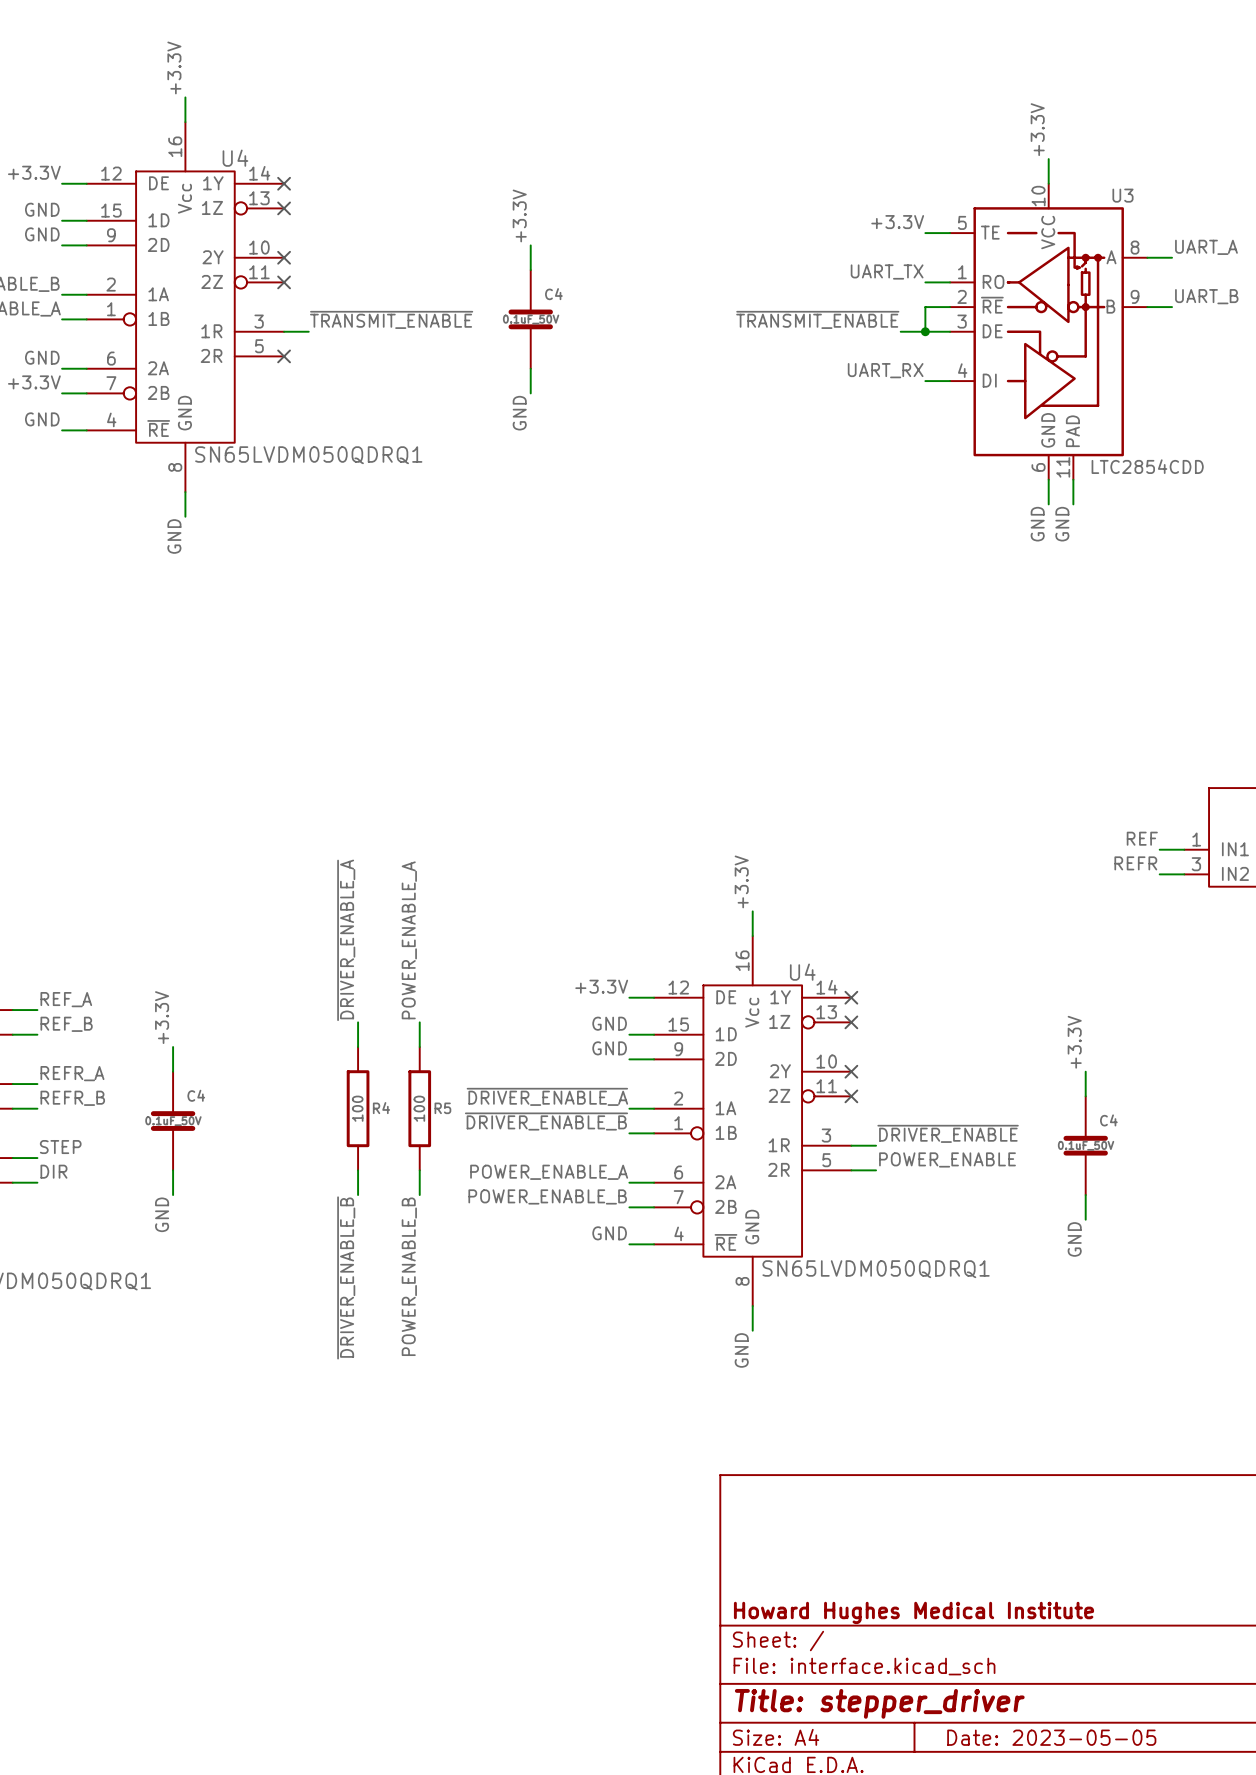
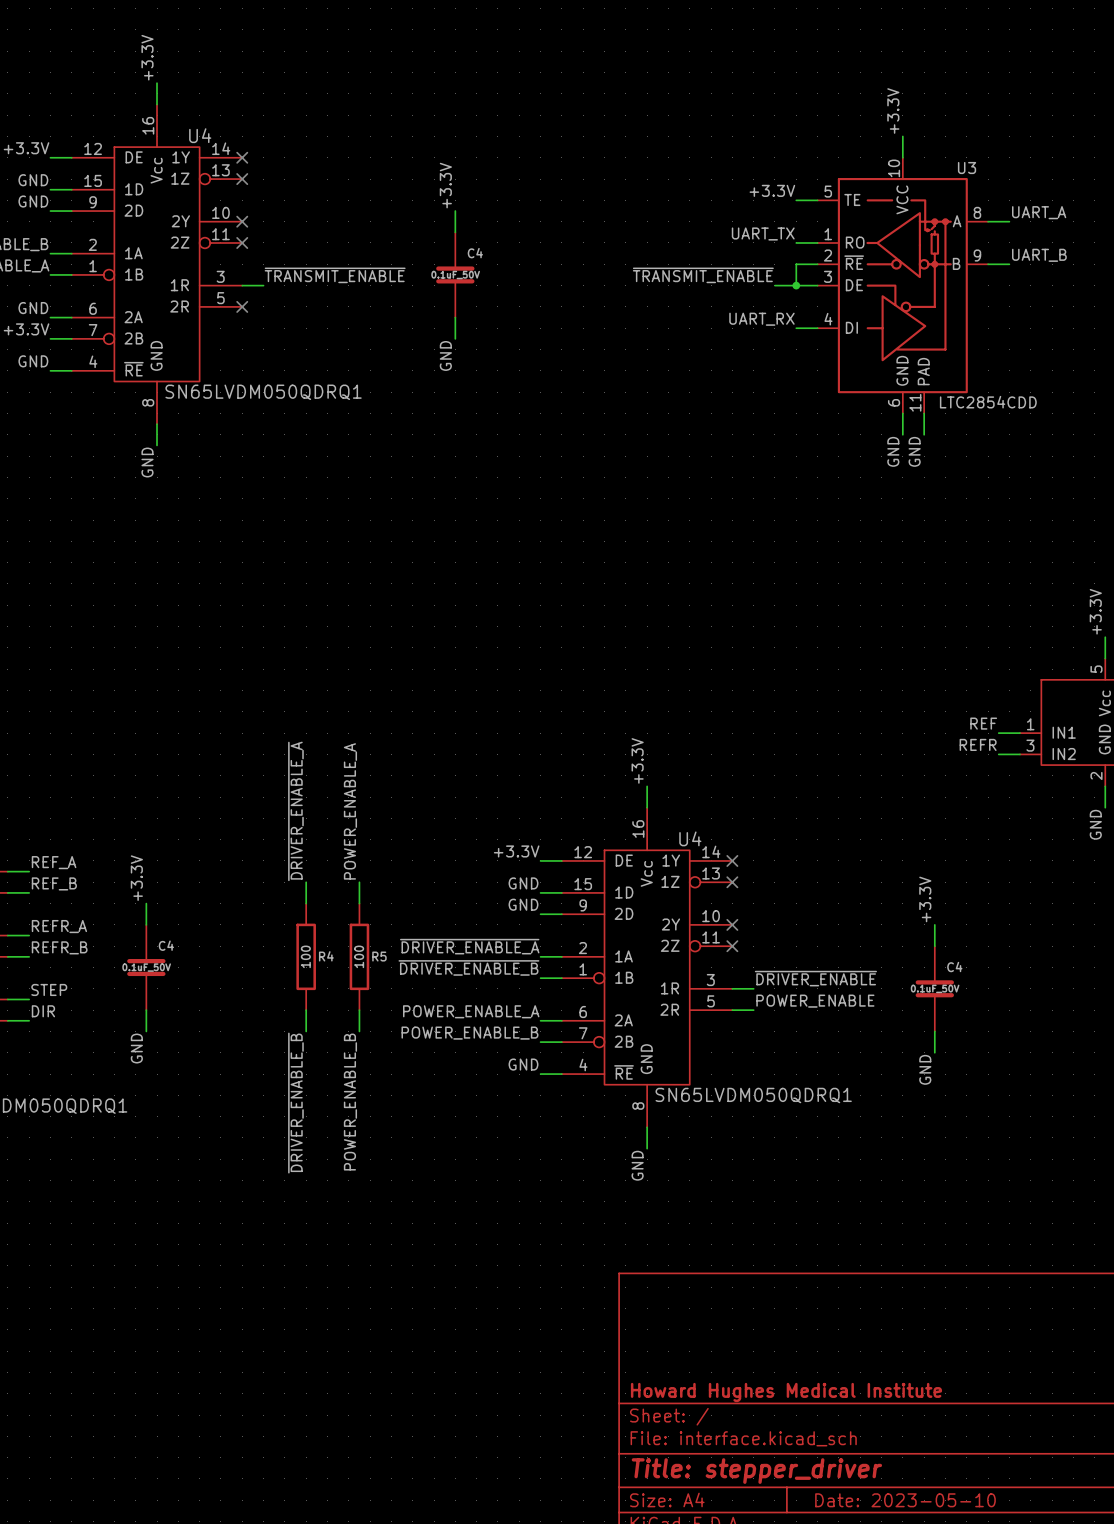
title block: Date: 2023-05-05 (1051, 1737) -> Date: 2023-05-10 (905, 1500)

